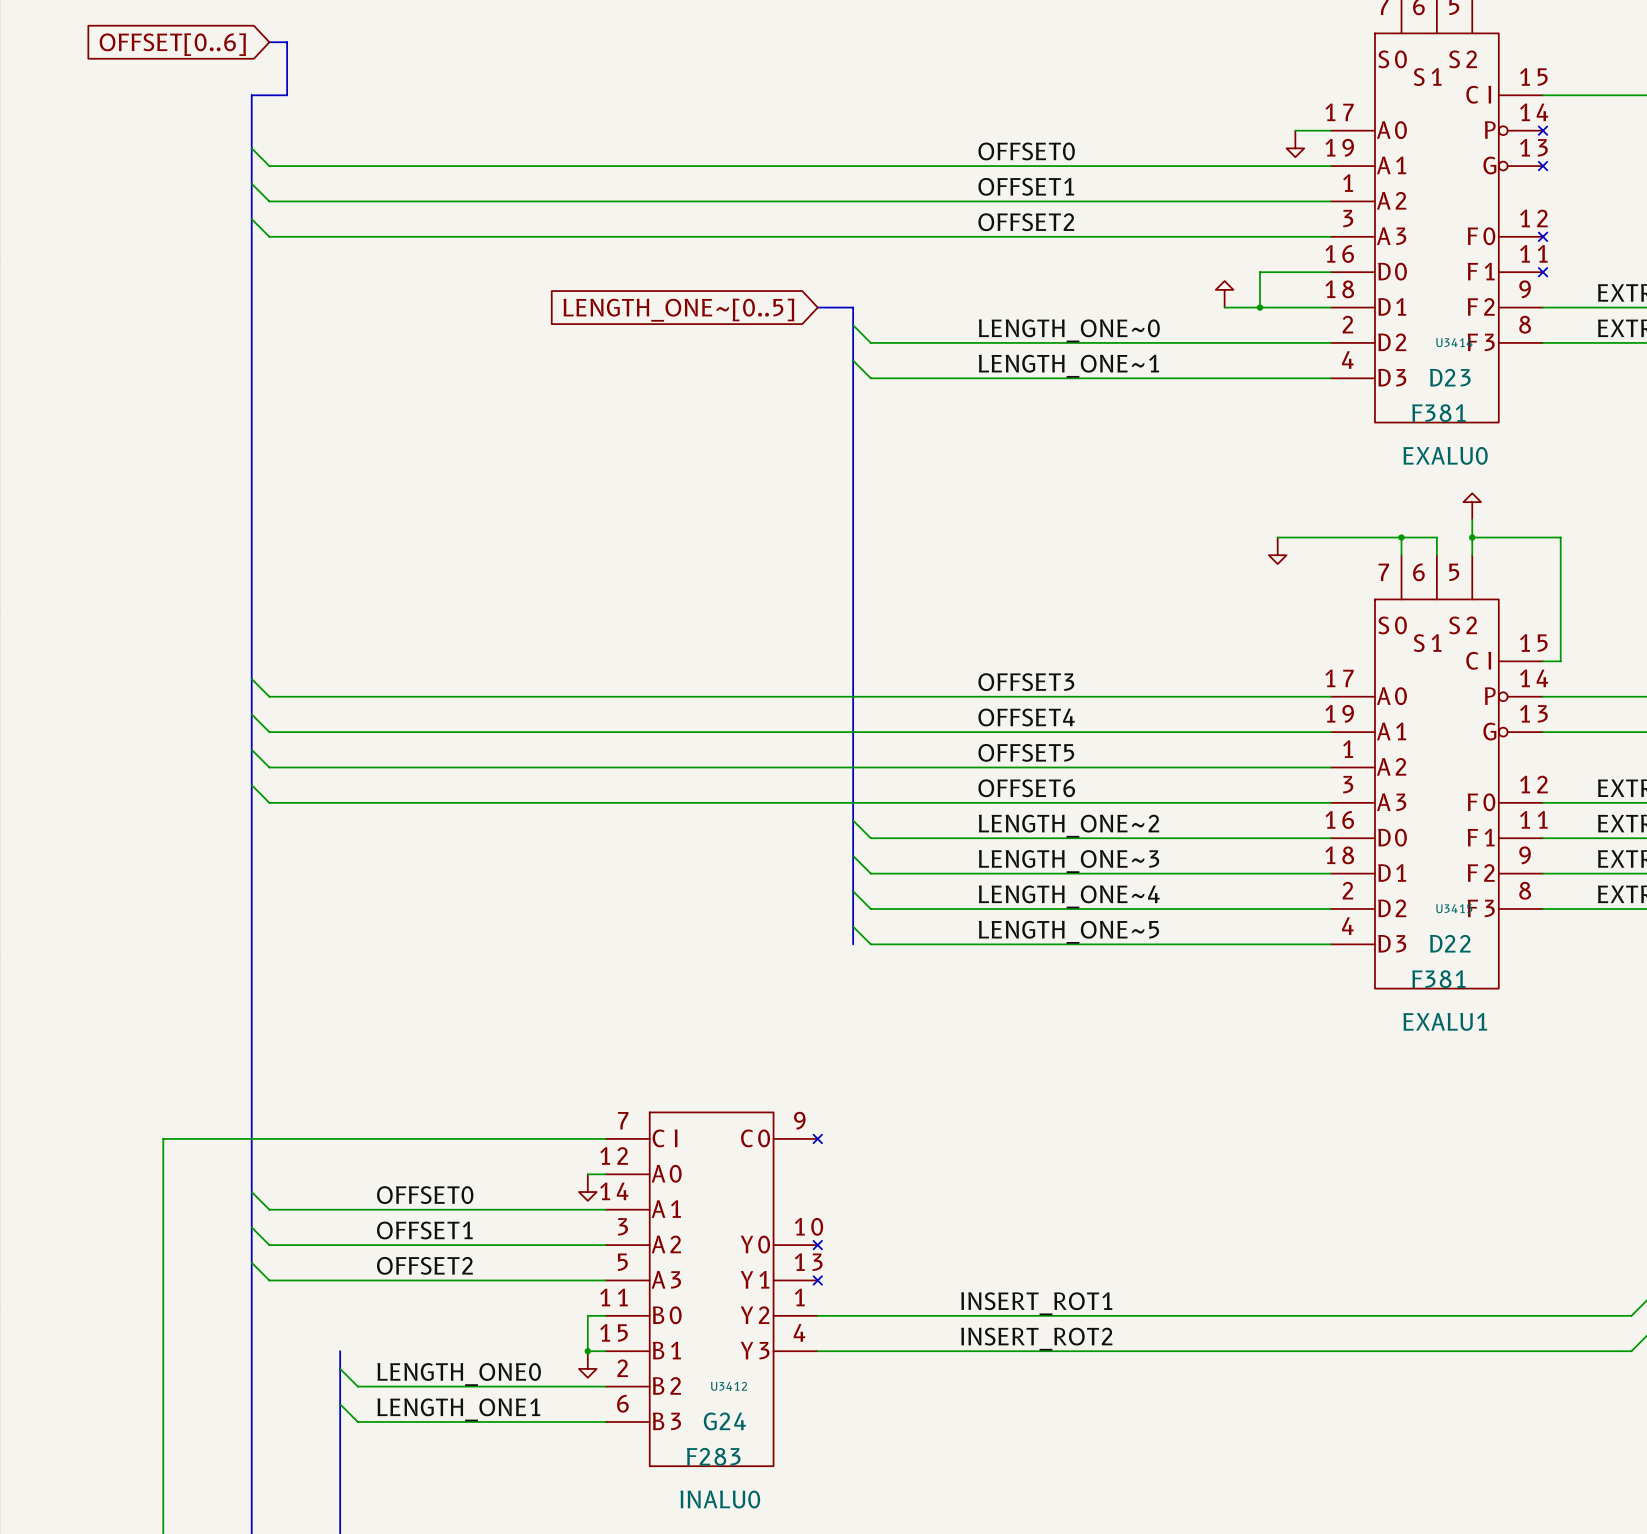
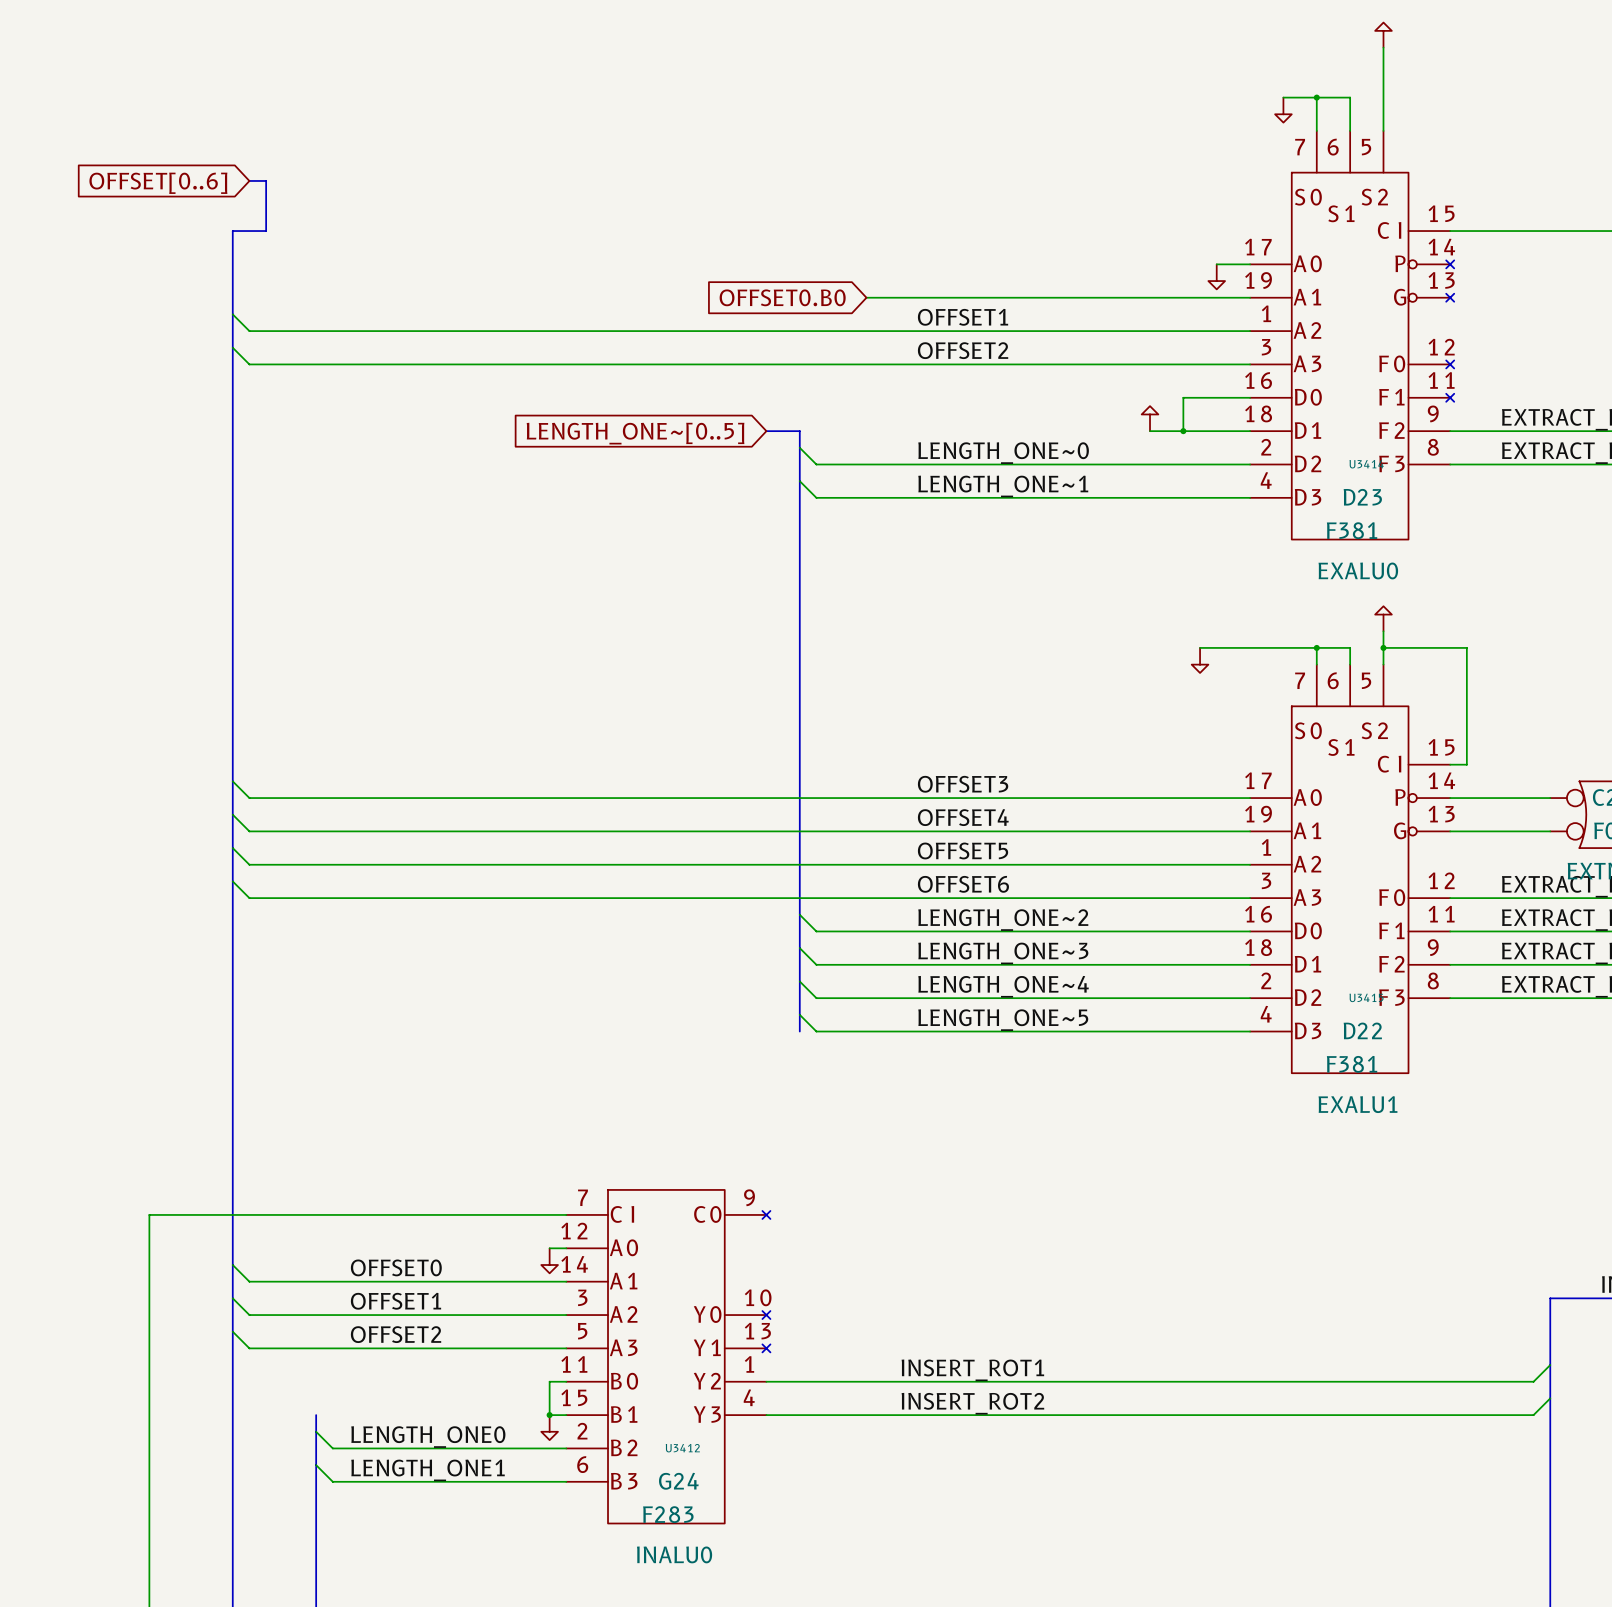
wire: (251, 148) (269, 166) (923, 166) -> none
label: OFFSET0 (1026, 151) -> none
global label: none -> OFFSET0.B0 (782, 297)

